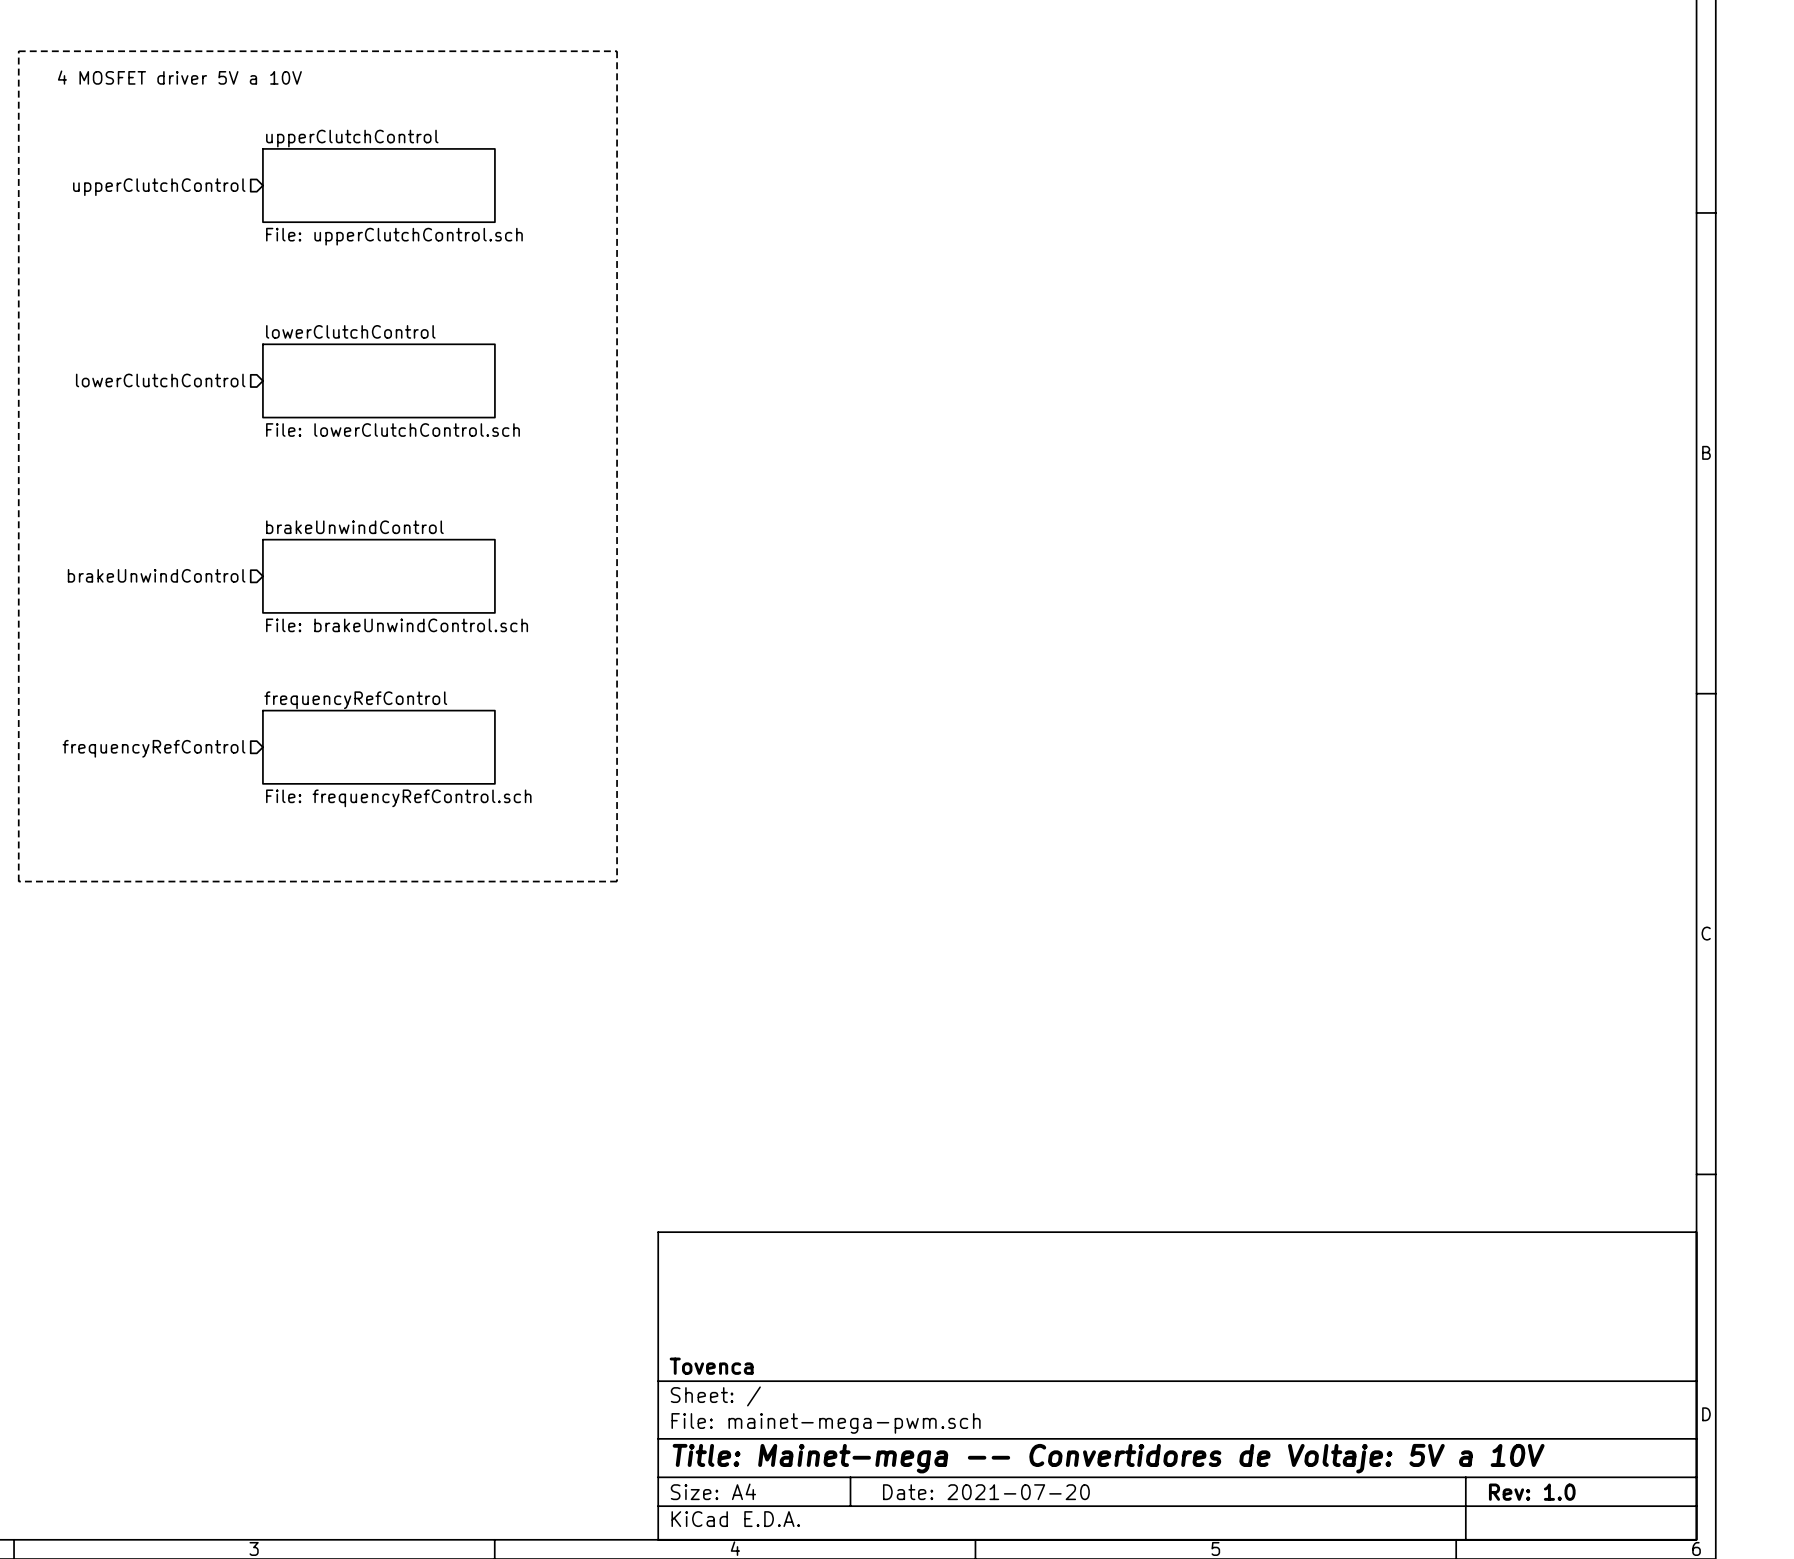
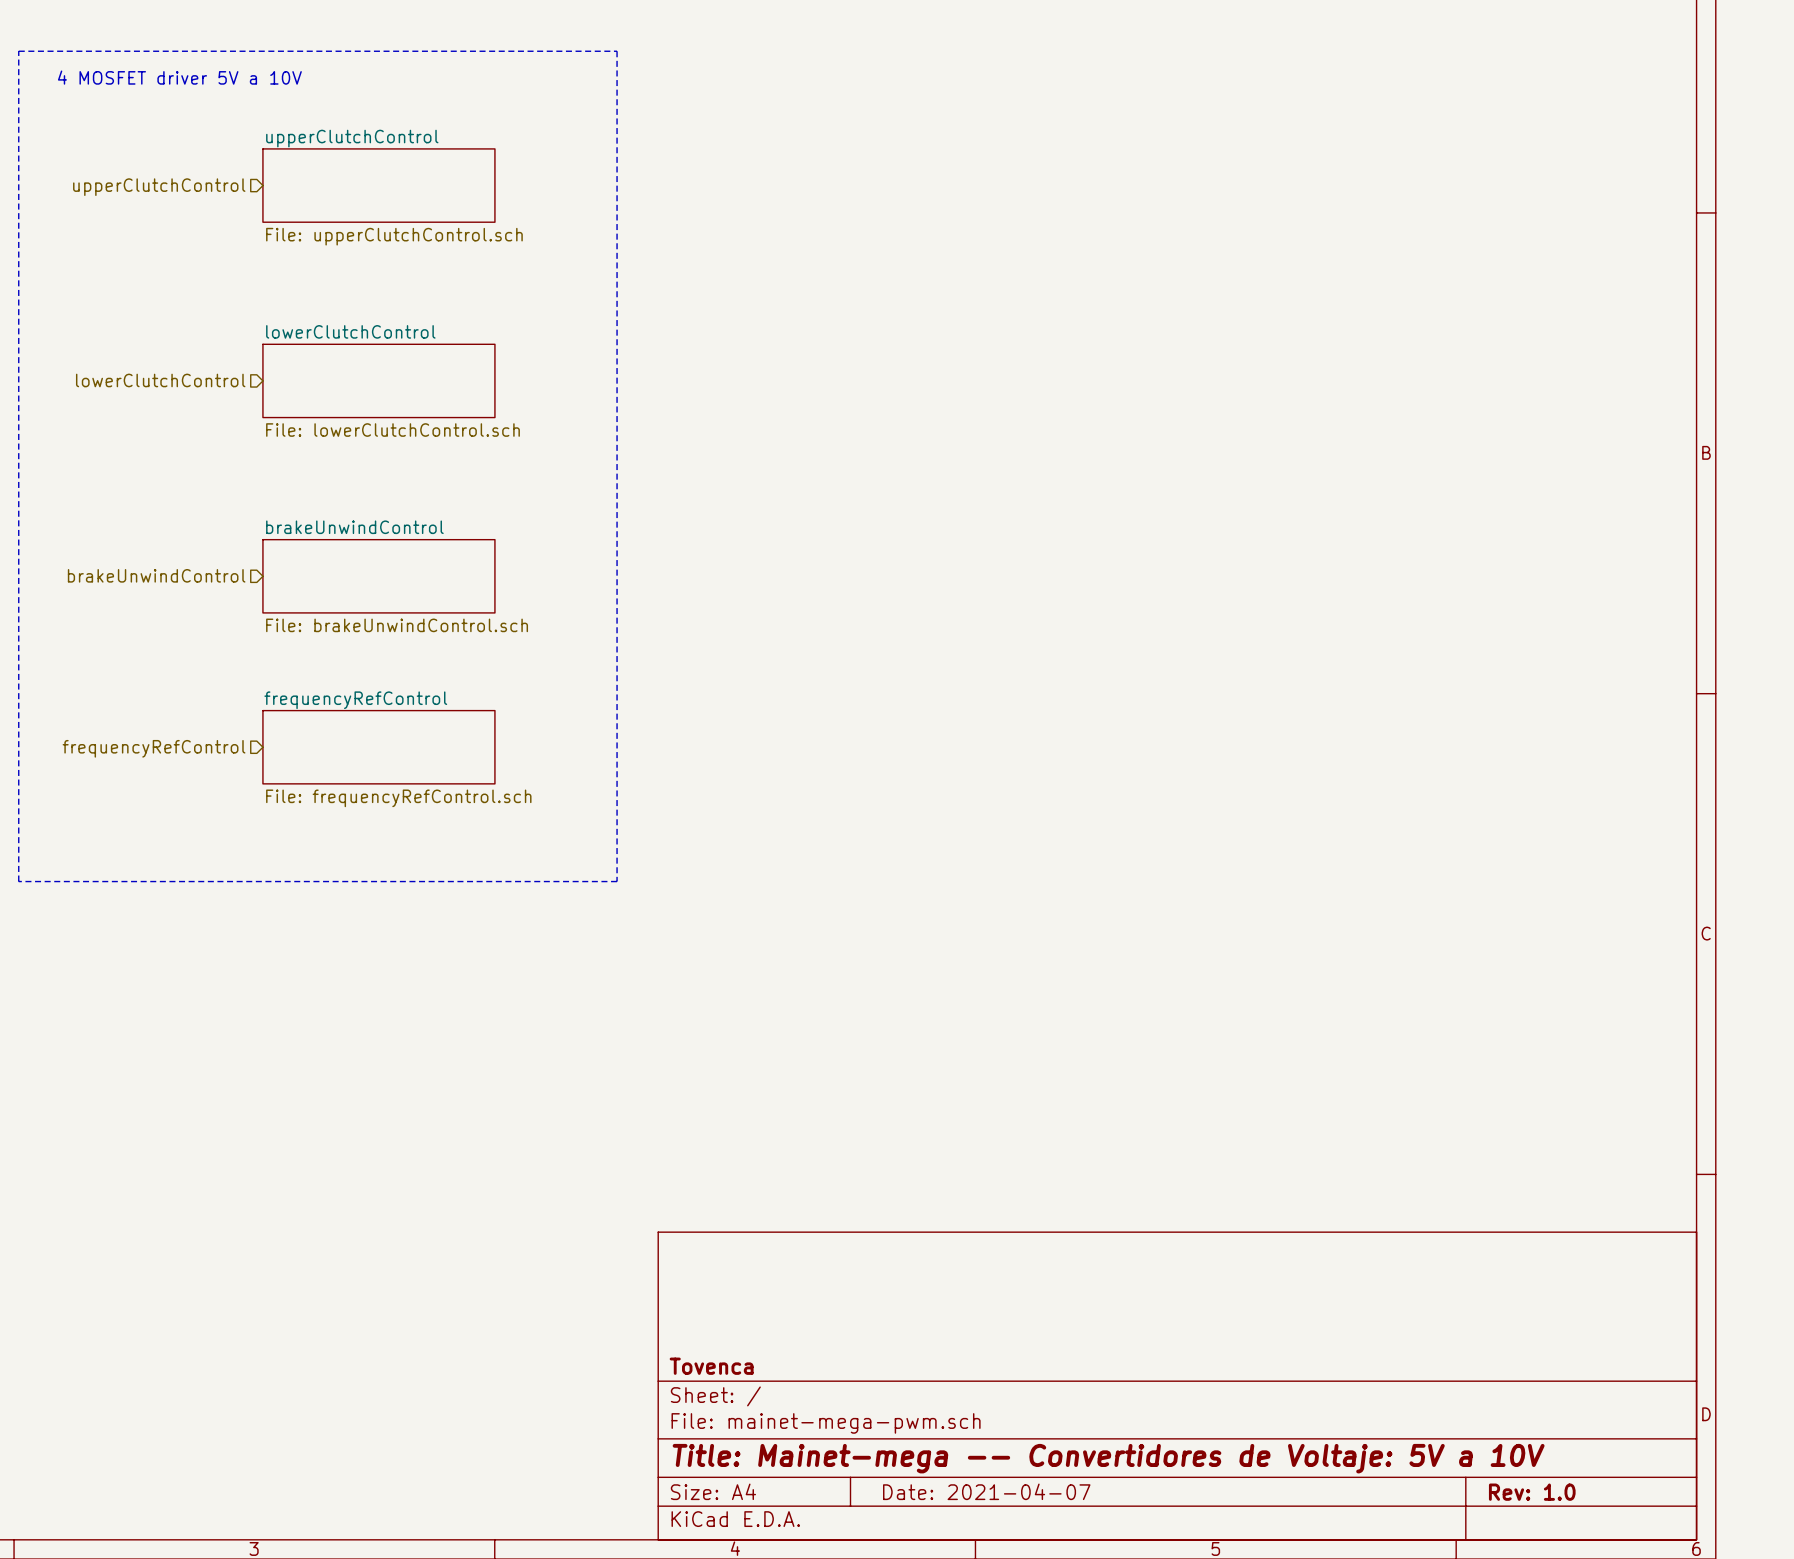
title block: Date: 2021-07-20 (986, 1492) -> Date: 2021-04-07 (986, 1491)

